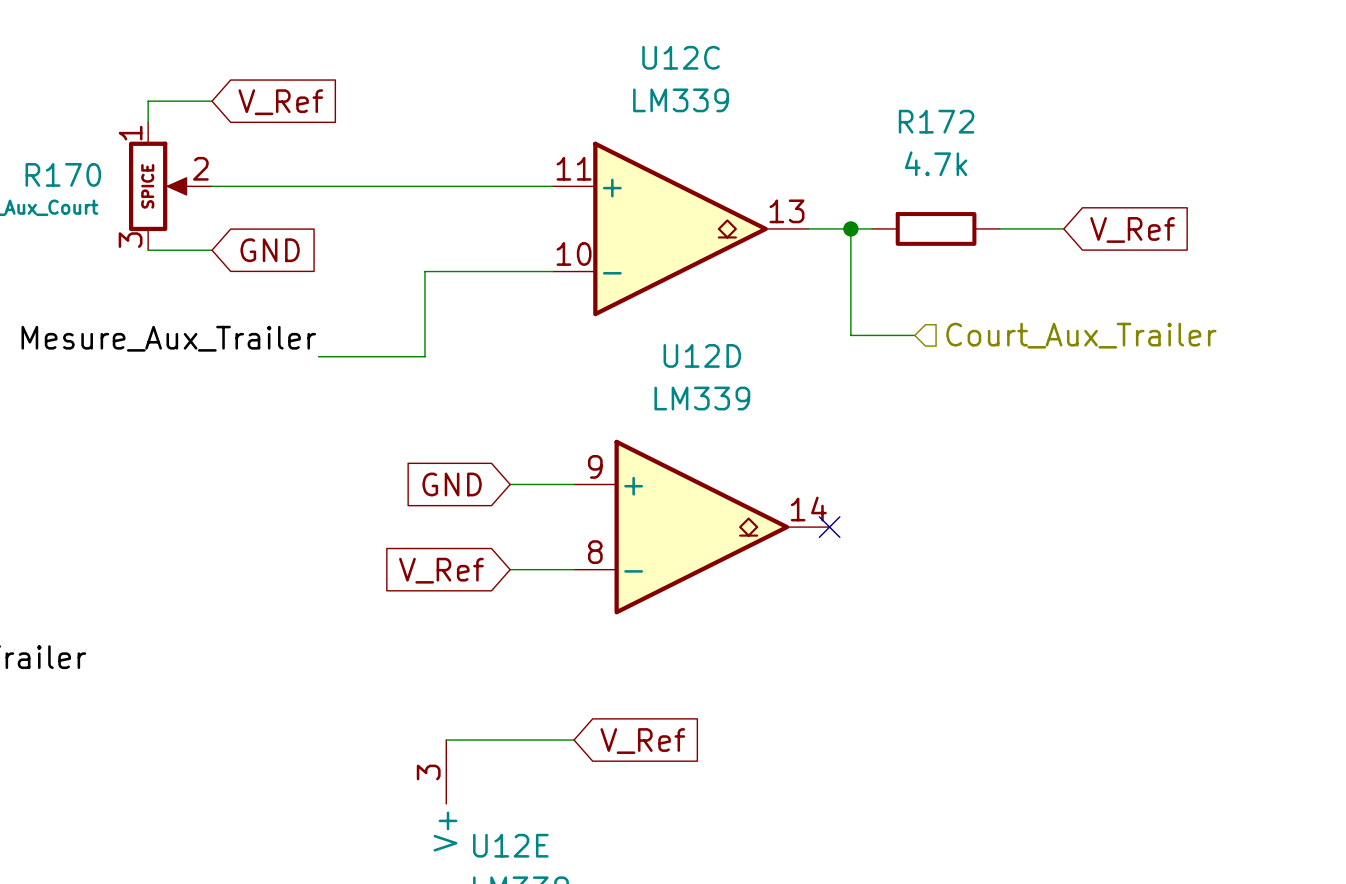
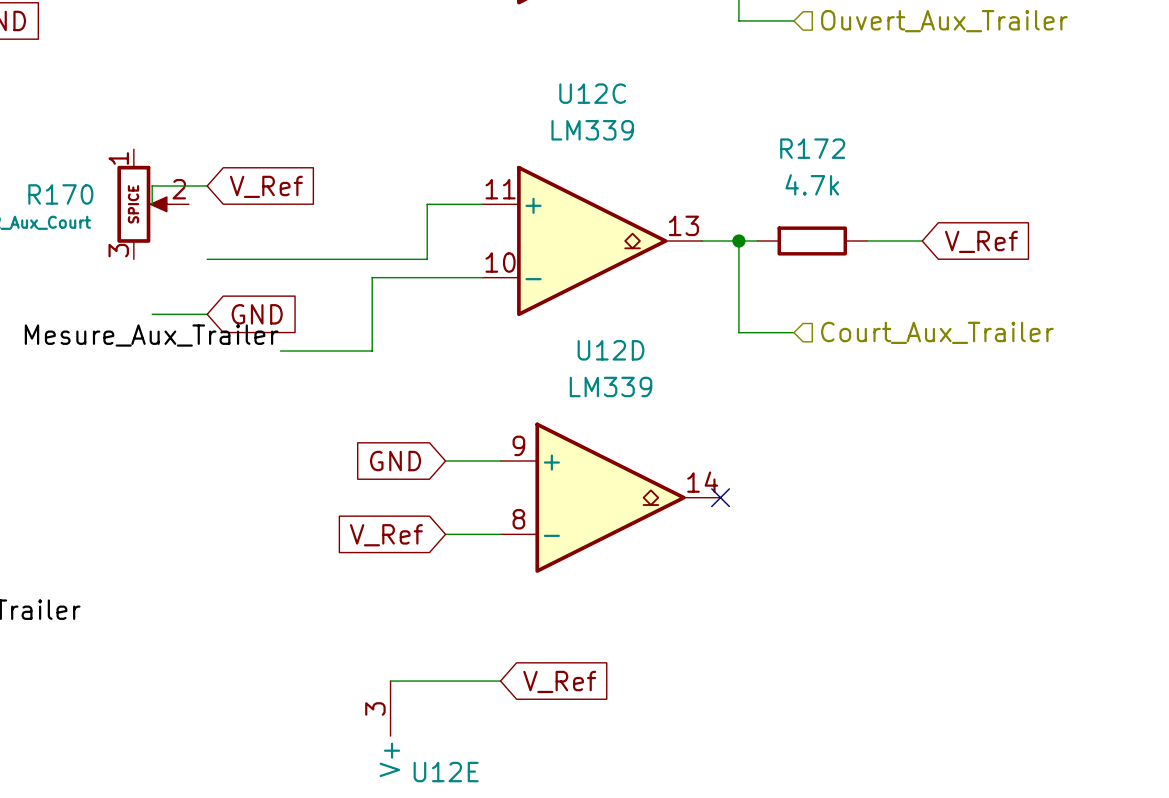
wire: (212, 101) (148, 101) (148, 122) -> (207, 185) (152, 185) (152, 204)
global label position: V_Ref (280, 102) -> V_Ref (266, 186)
wire: (212, 186) (488, 186) -> (207, 259) (427, 259) (427, 204)
wire: (148, 250) (212, 250) -> (152, 314) (207, 314)
global label position: GND (270, 250) -> GND (257, 314)

